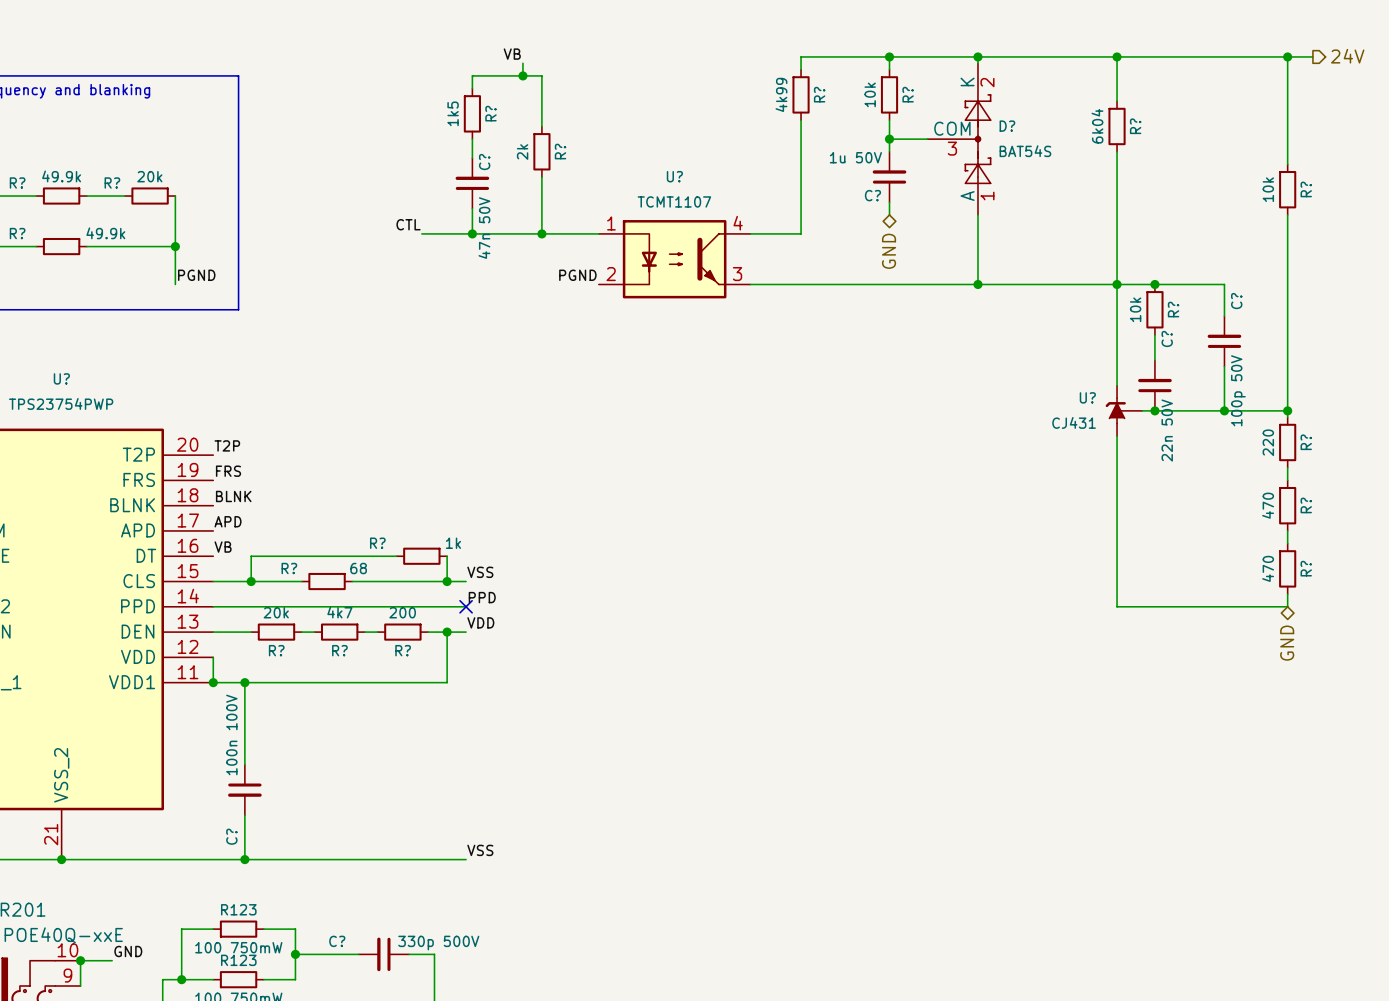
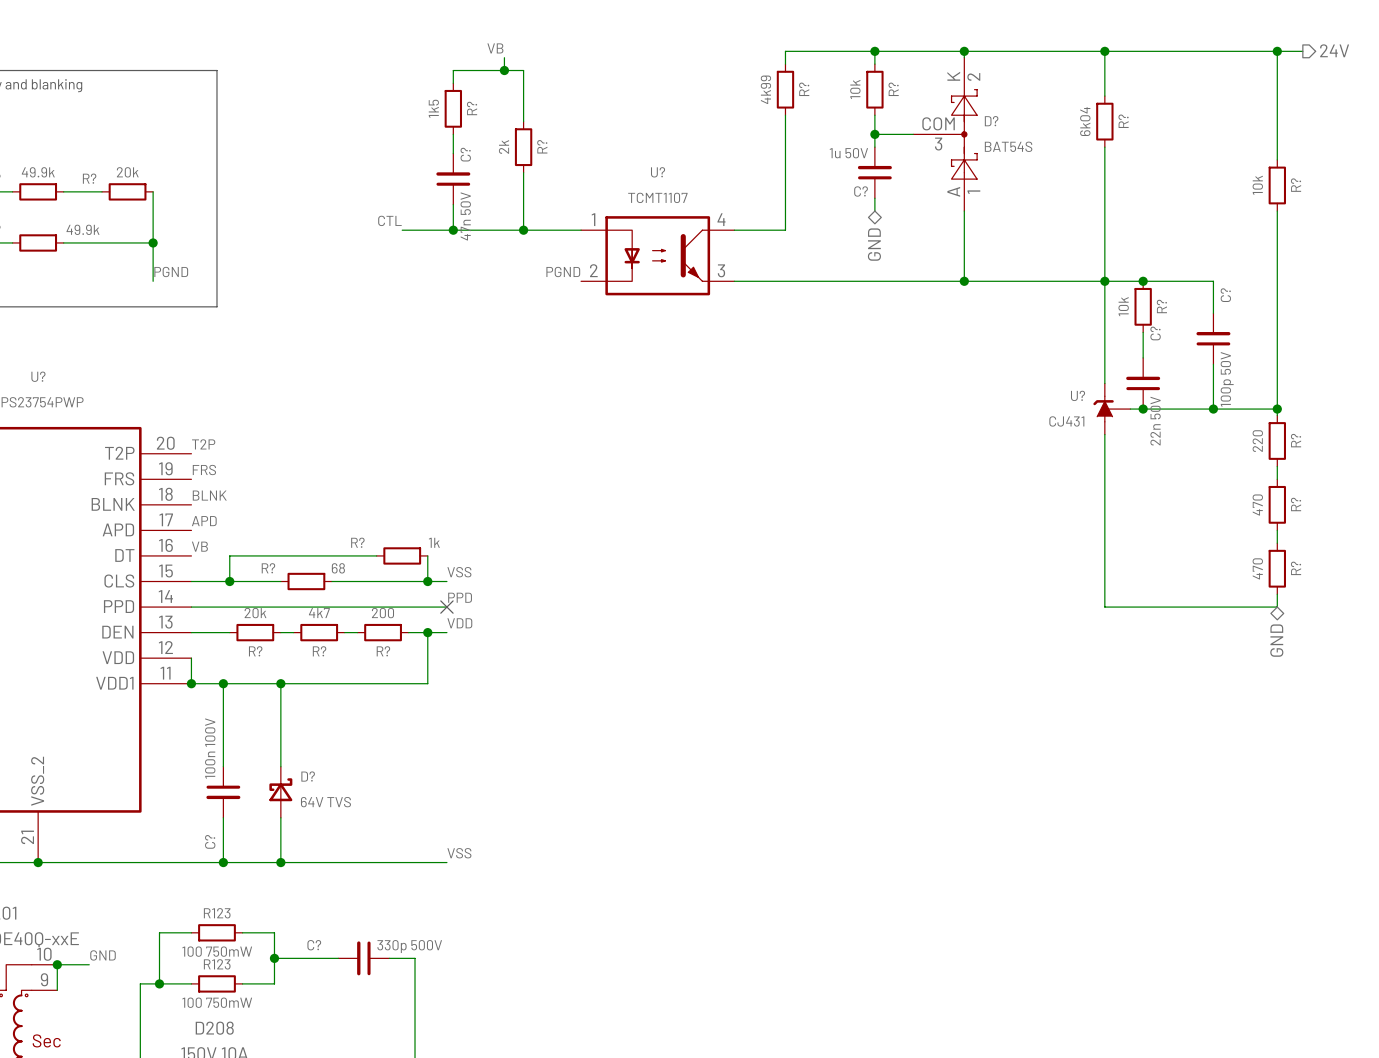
wire: none -> (280, 683) (280, 766)
junction: none -> (280, 683)
D?: none -> 64V TVS (280, 792)
wire: none -> (280, 817) (280, 862)
junction: none -> (280, 862)

